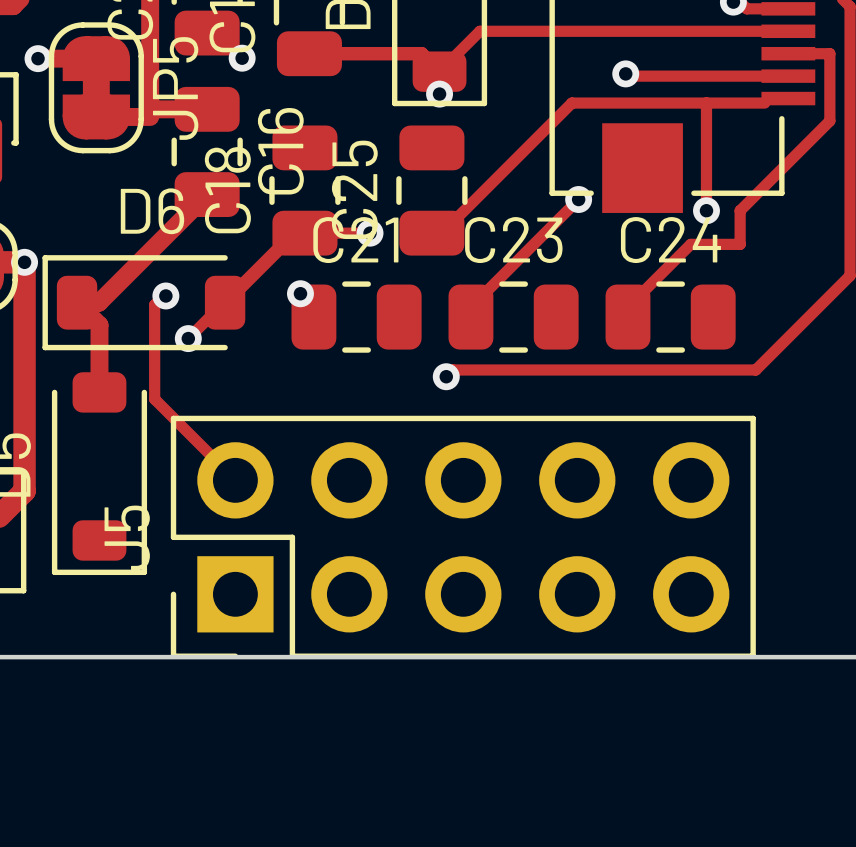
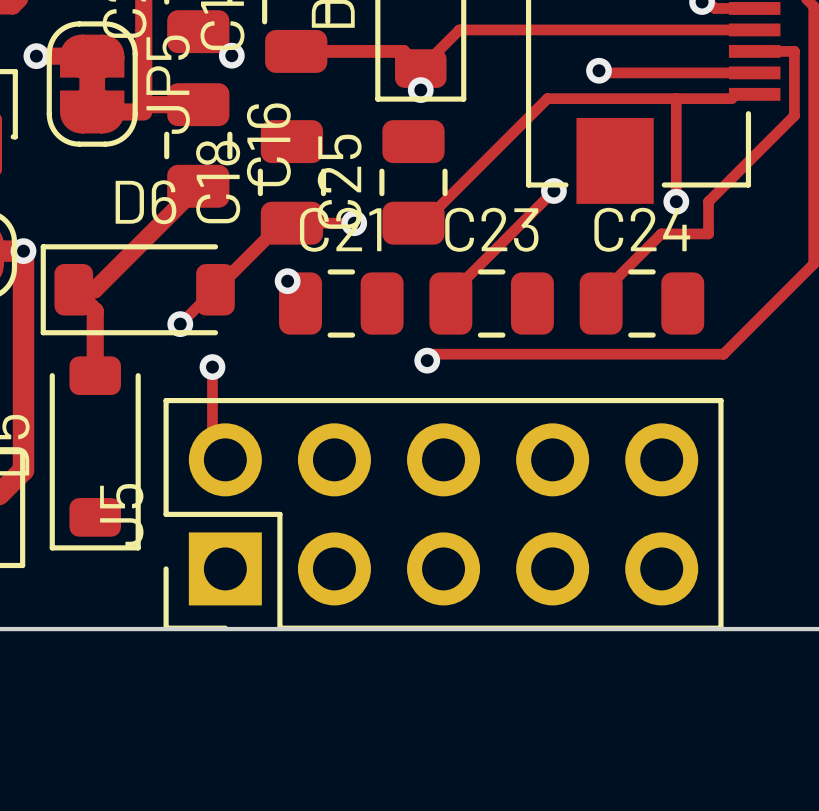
track: (165, 295) (154, 304) (154, 399) (212, 457) -> none
via position: (165, 295) -> (212, 367)
track: none -> (212, 367) (212, 437)

